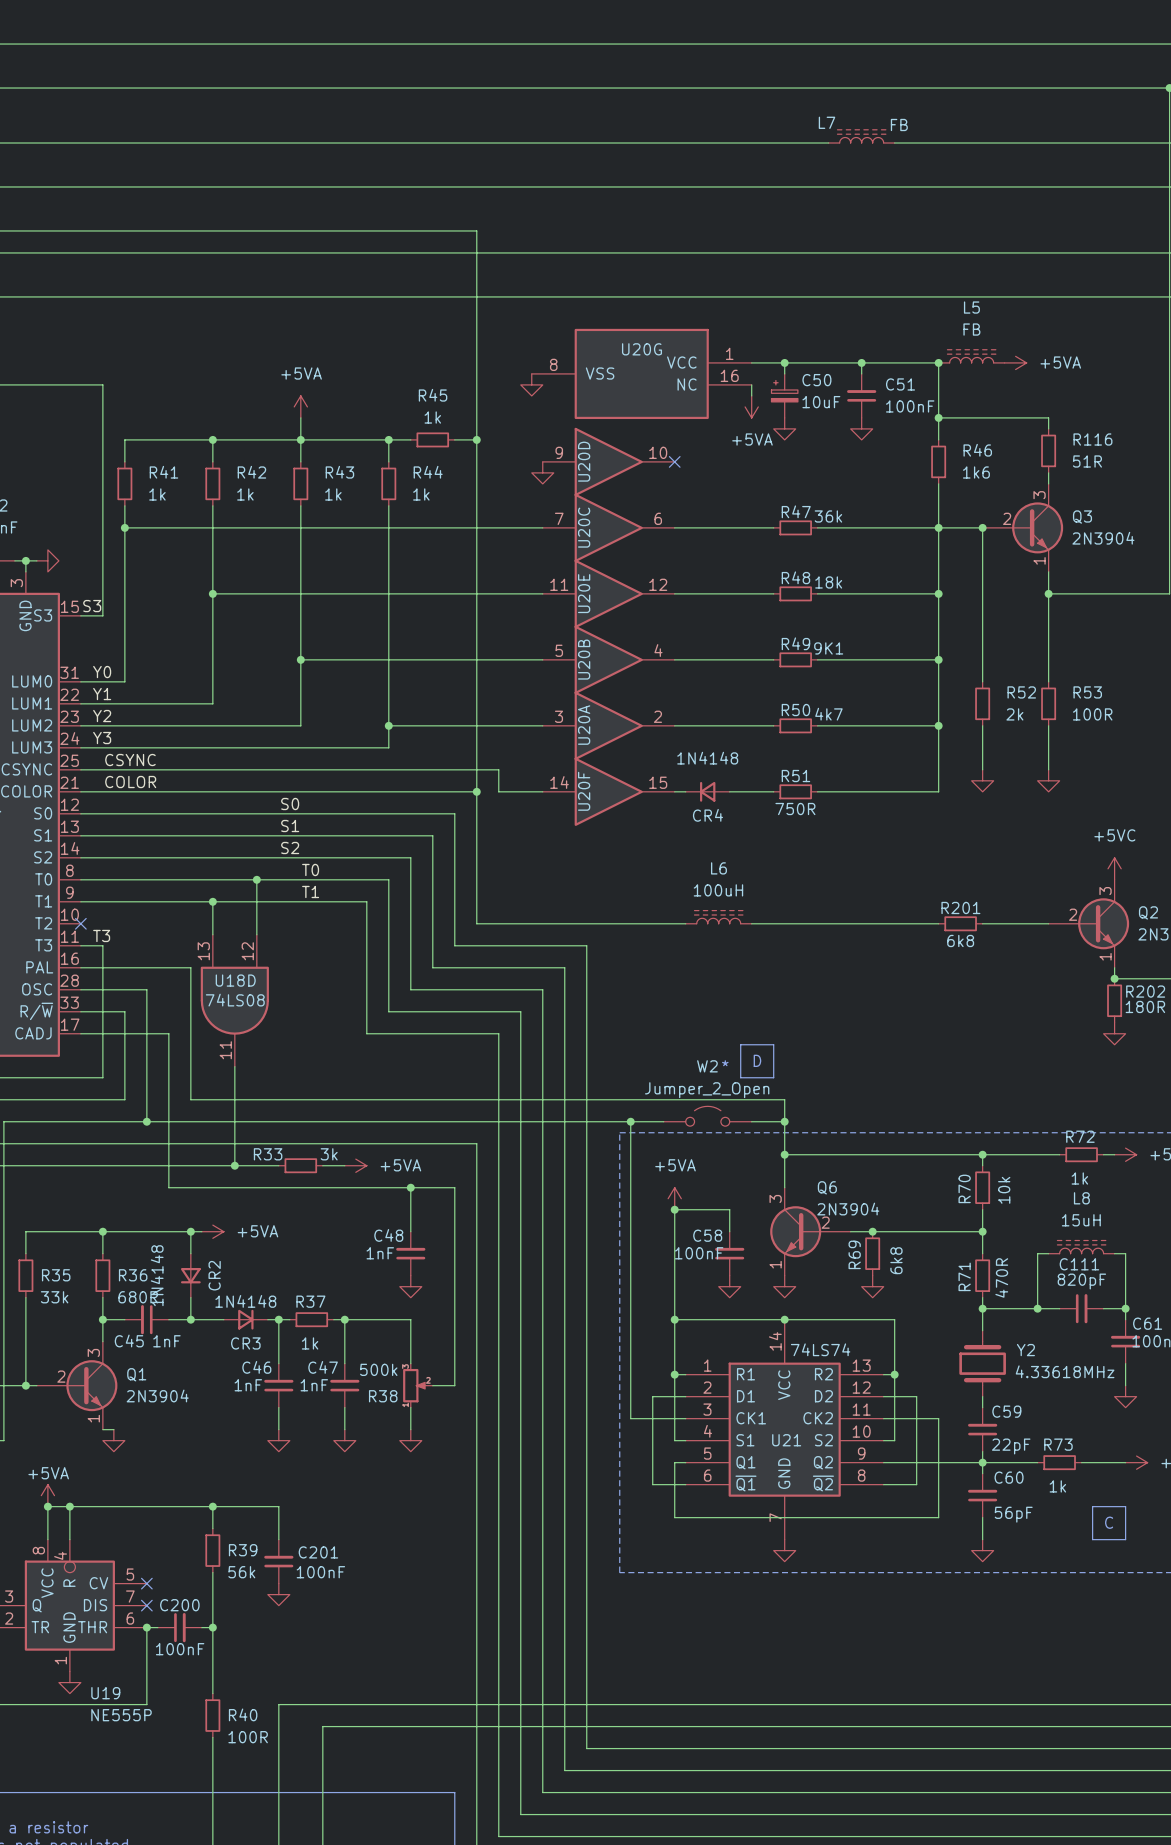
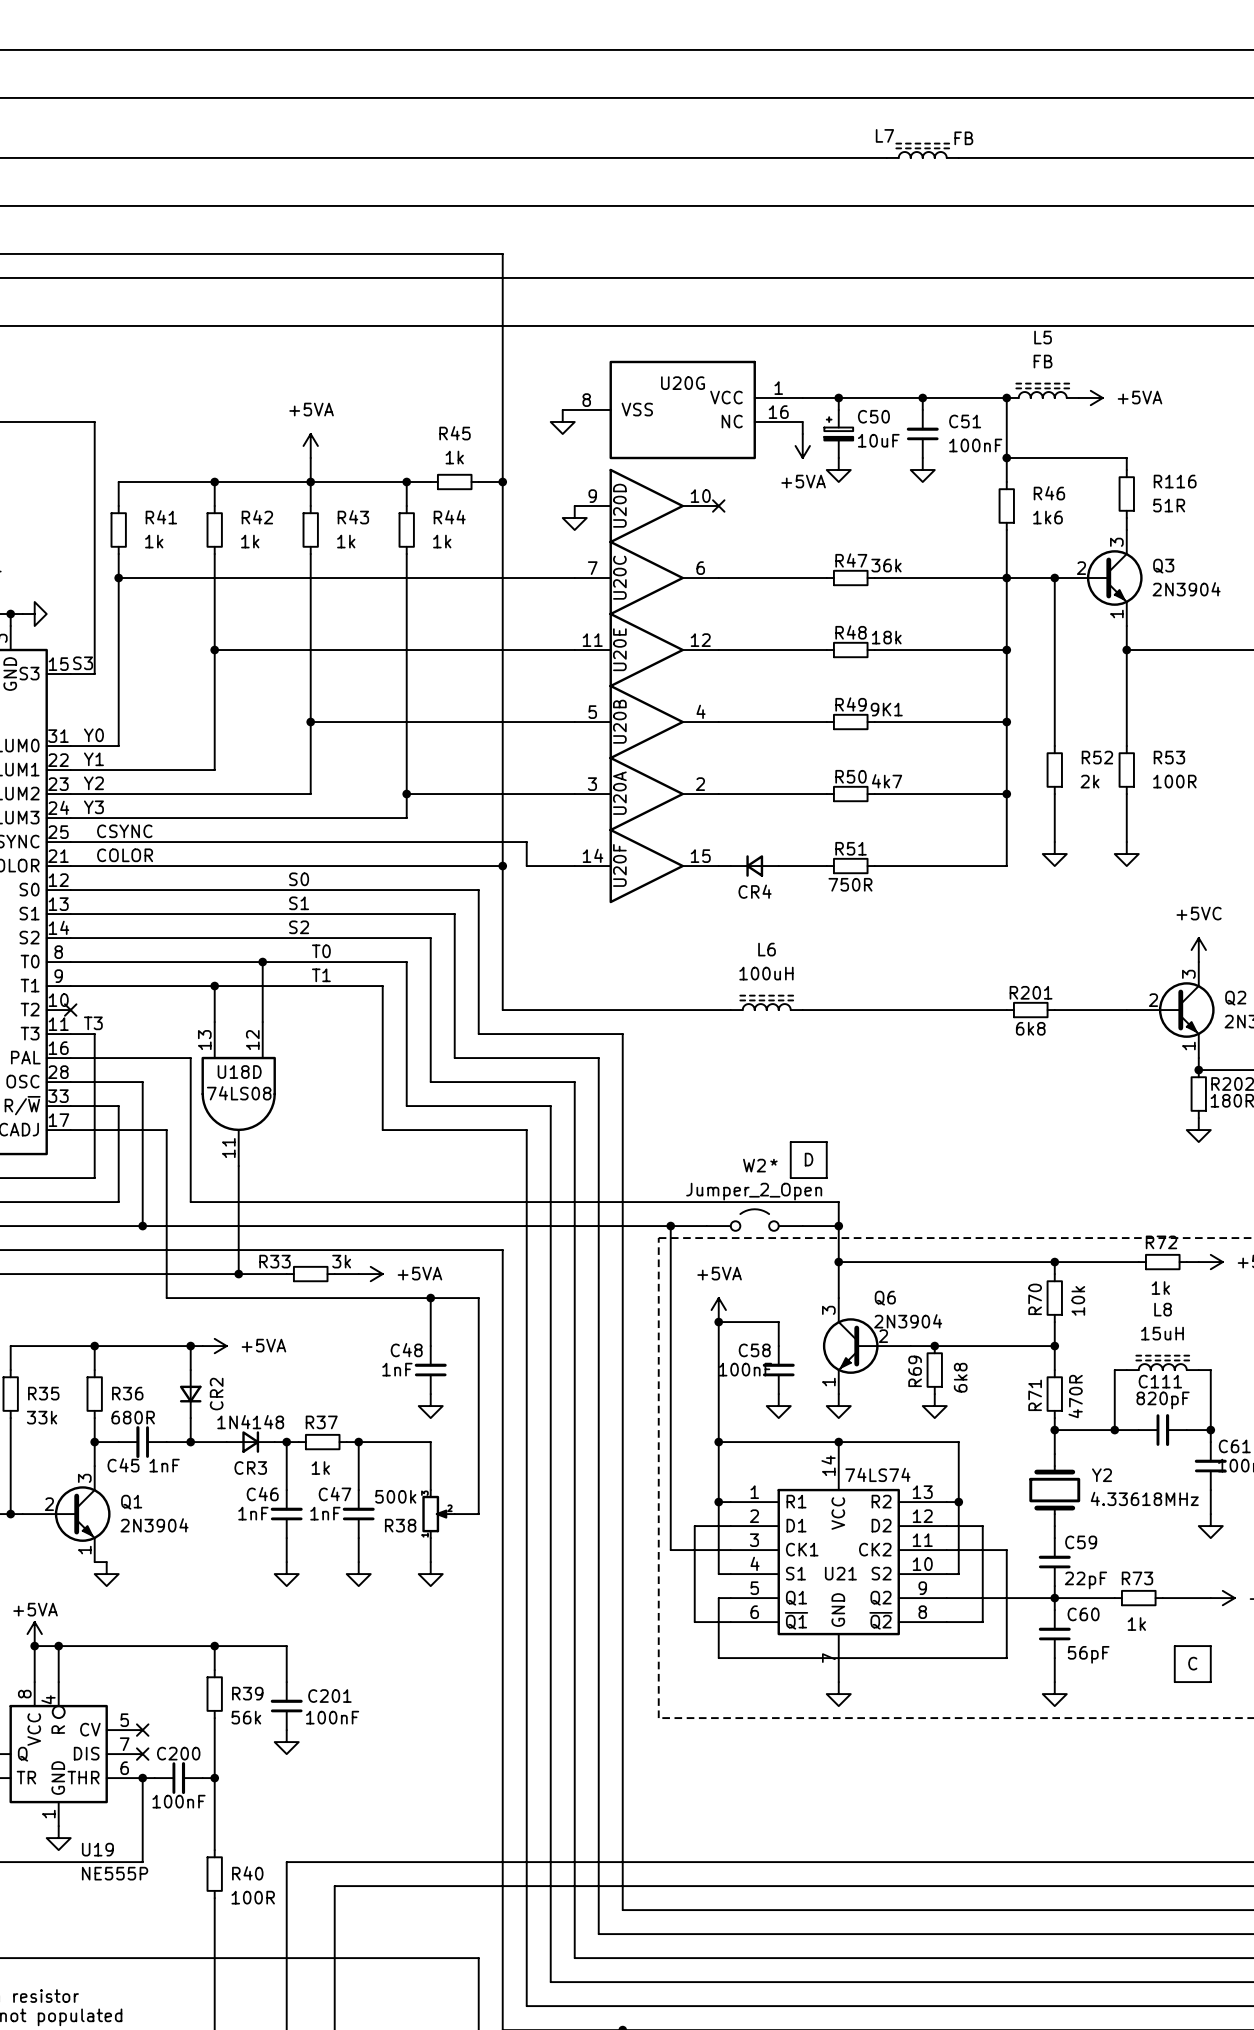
CR4 value: 1N4148 (707, 758) -> none
CR2 value: 1N4148 (157, 1275) -> none

